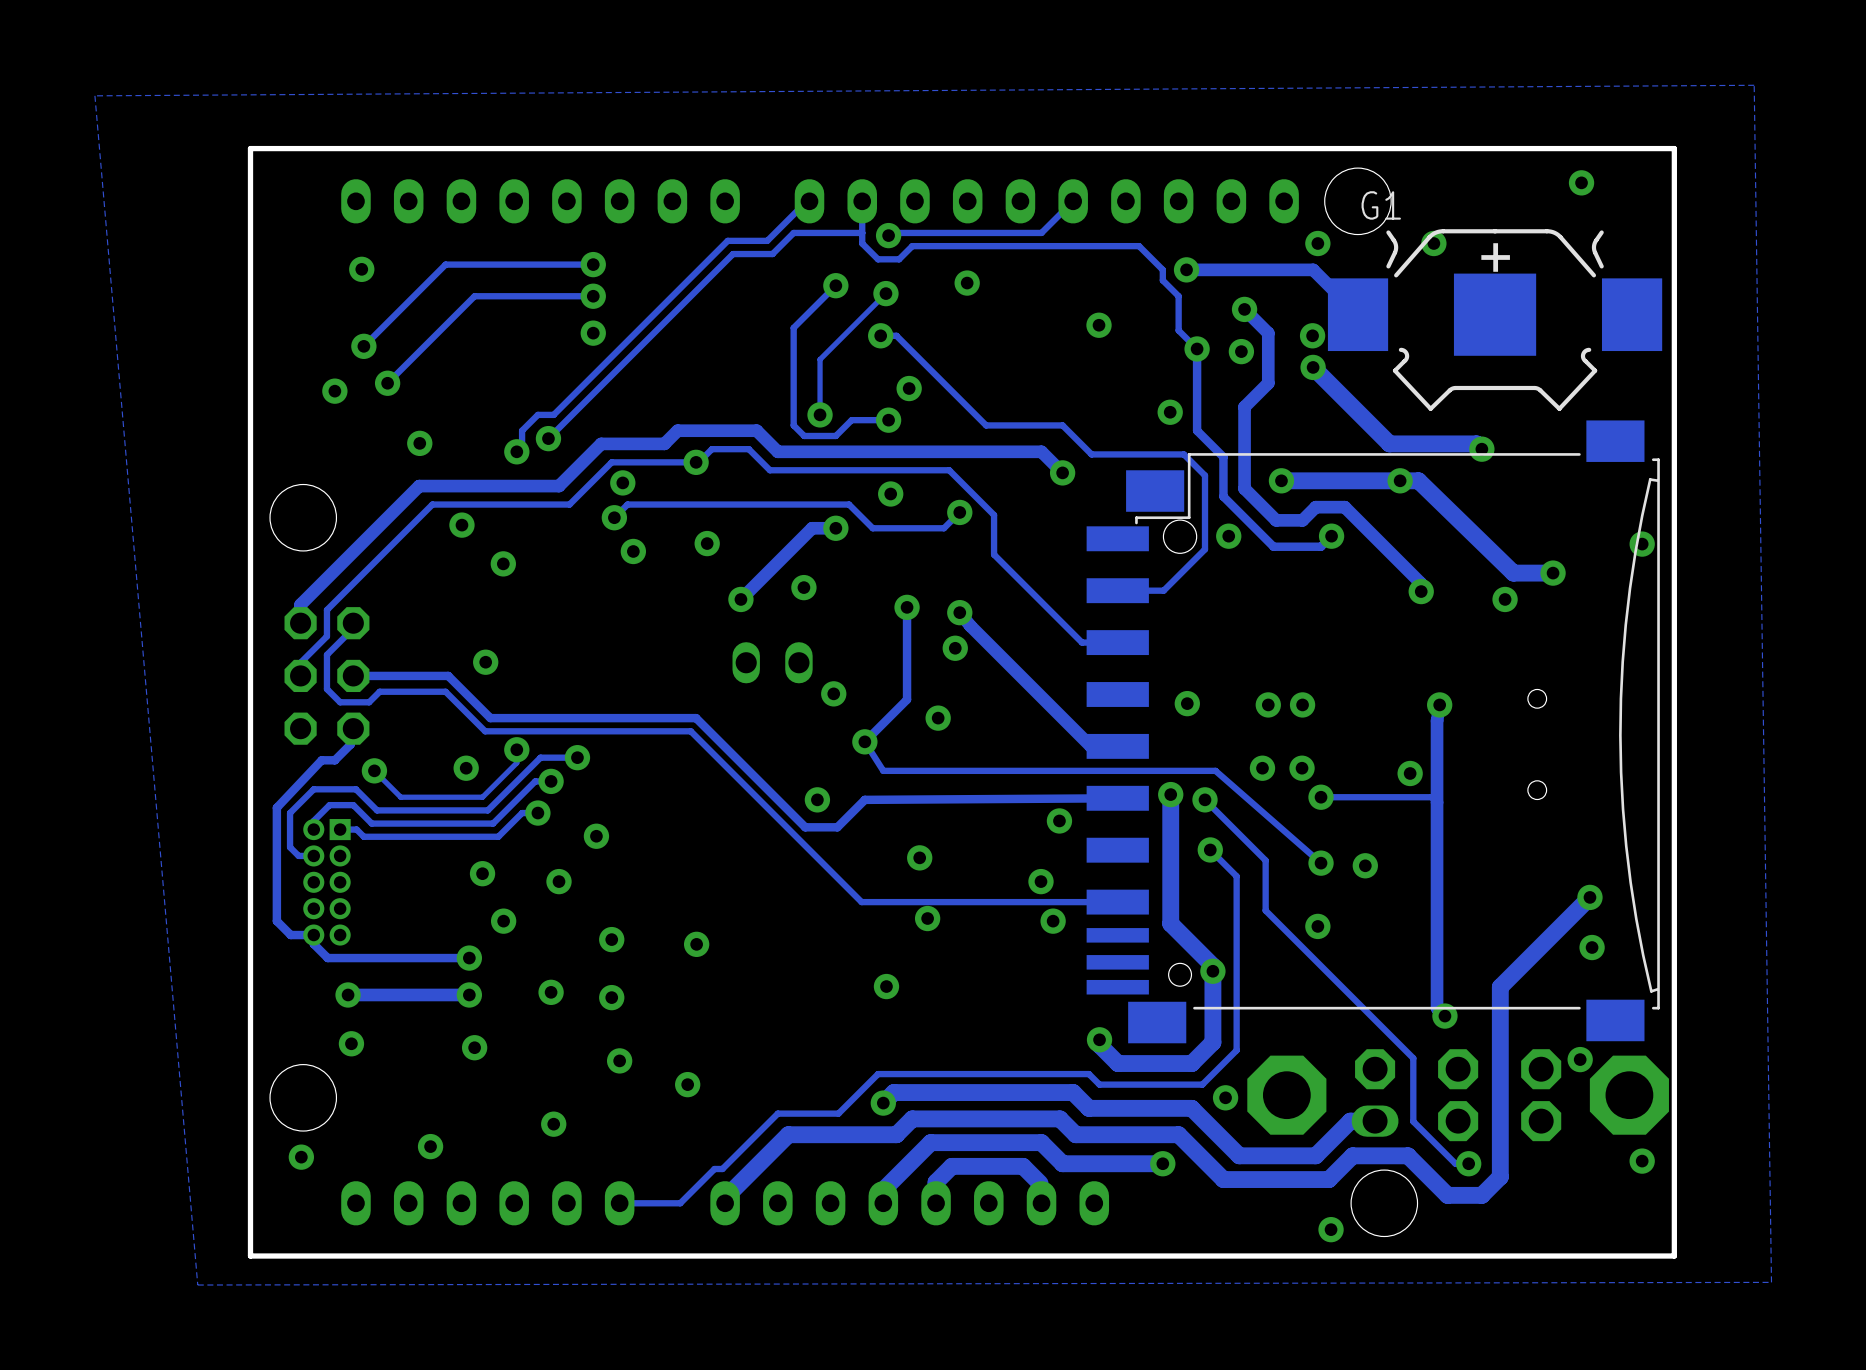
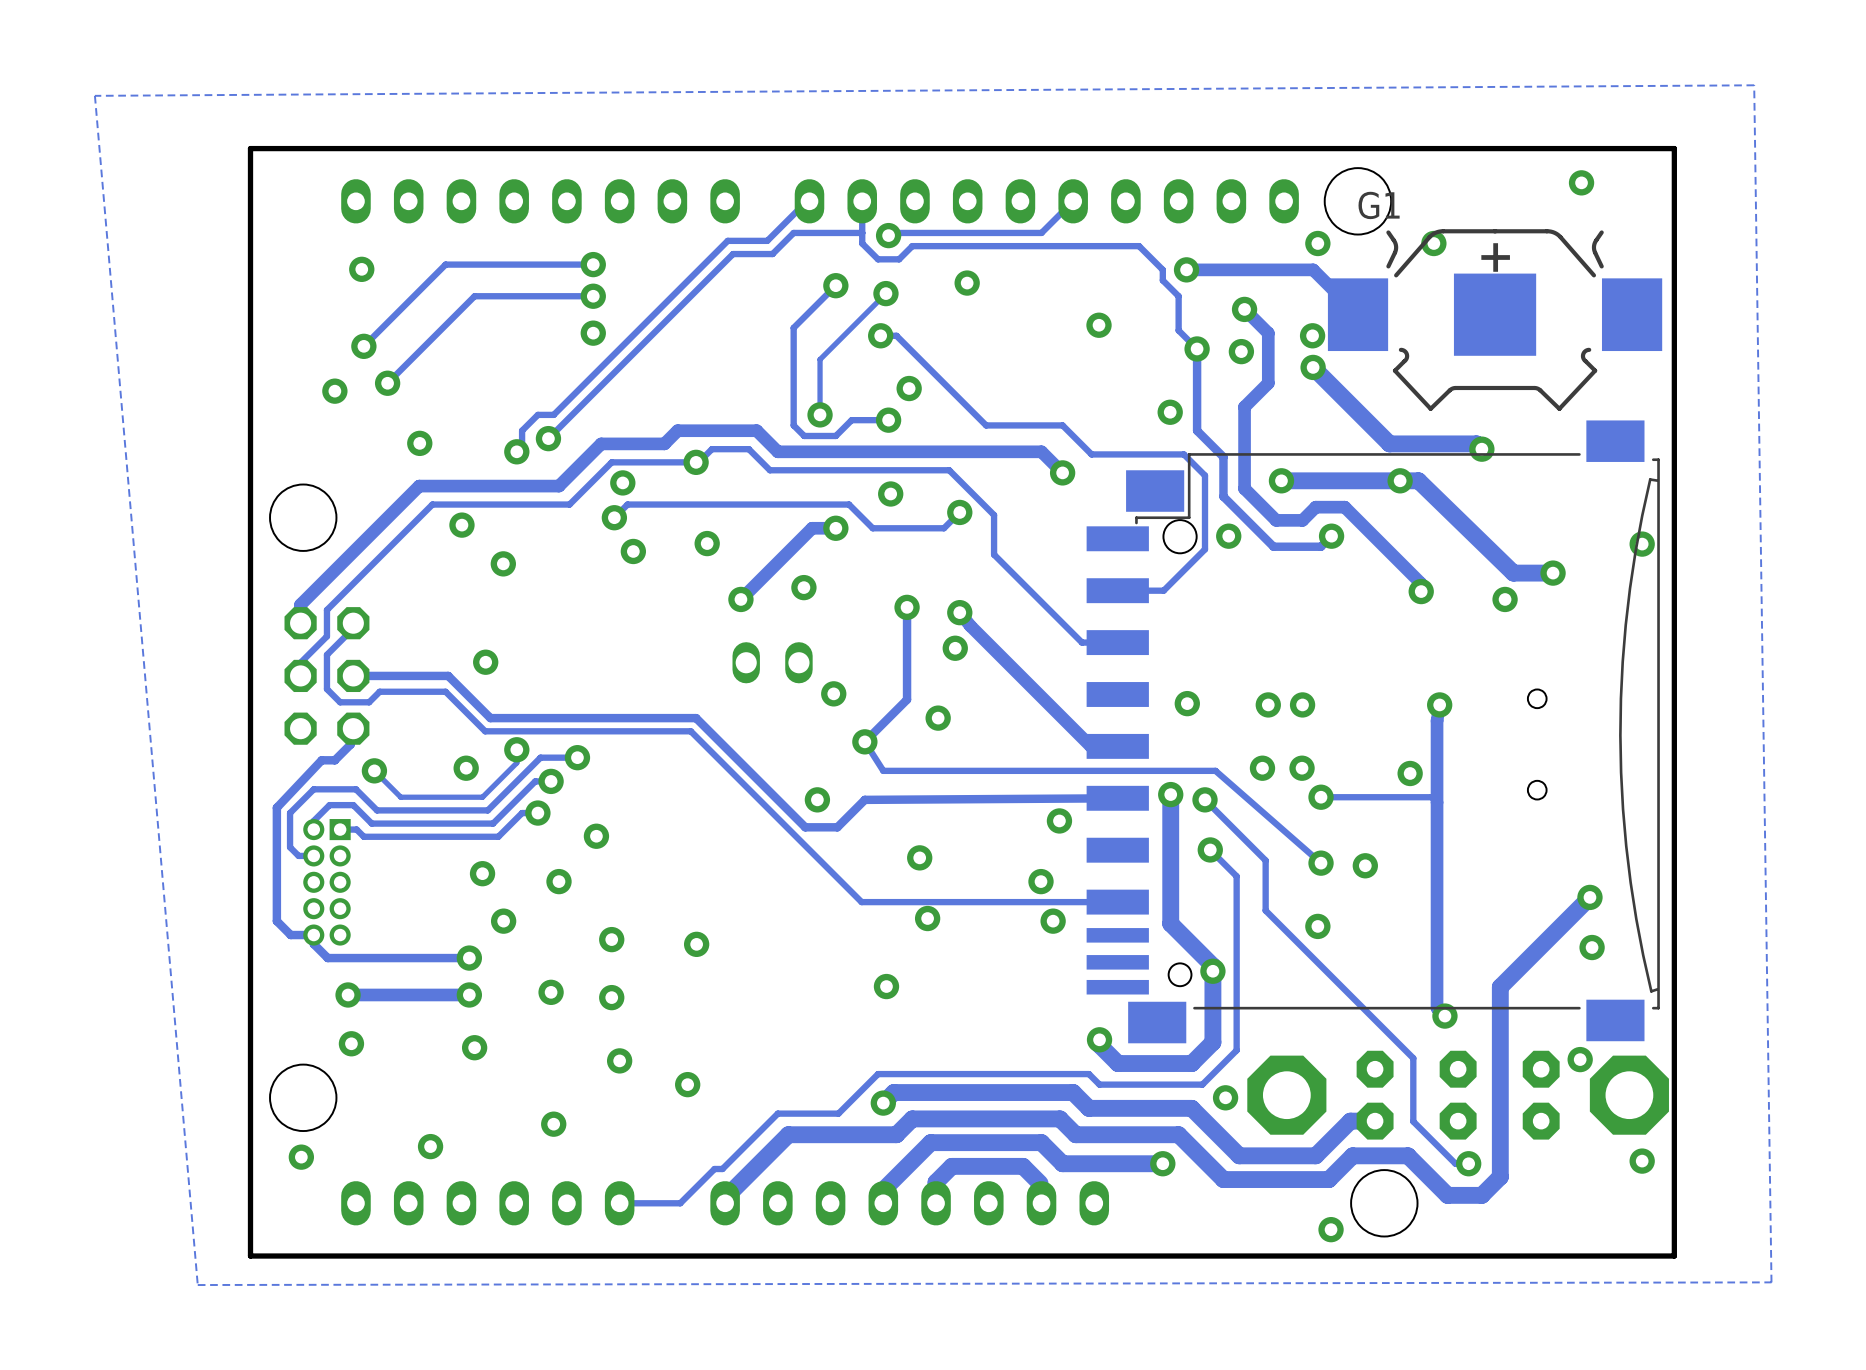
part footprint: [1247, 1049, 1669, 1142] -> [1247, 1050, 1669, 1140]

